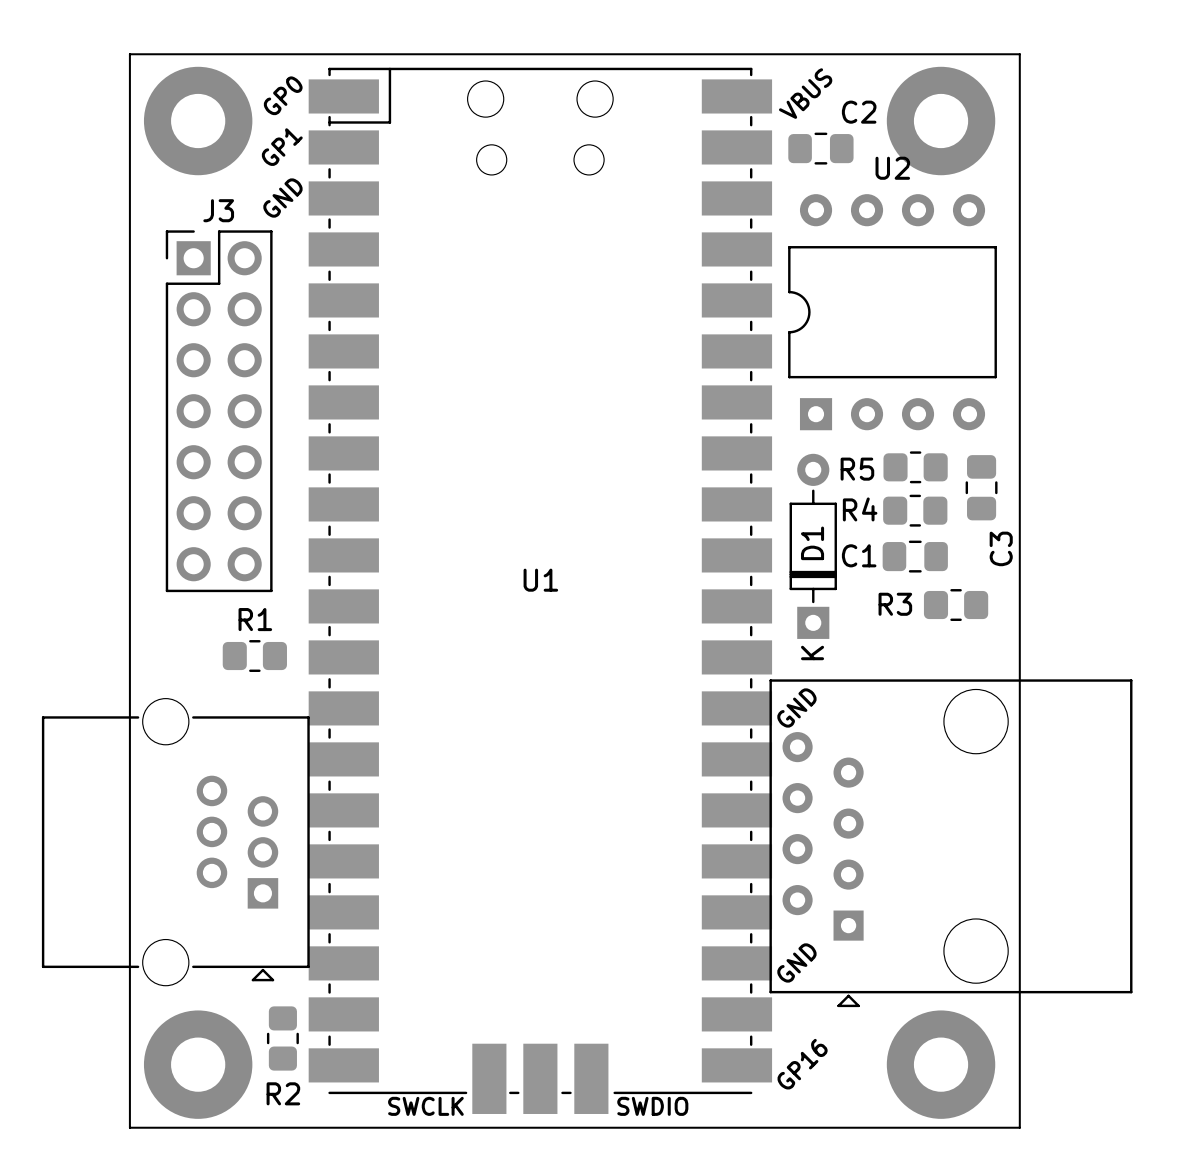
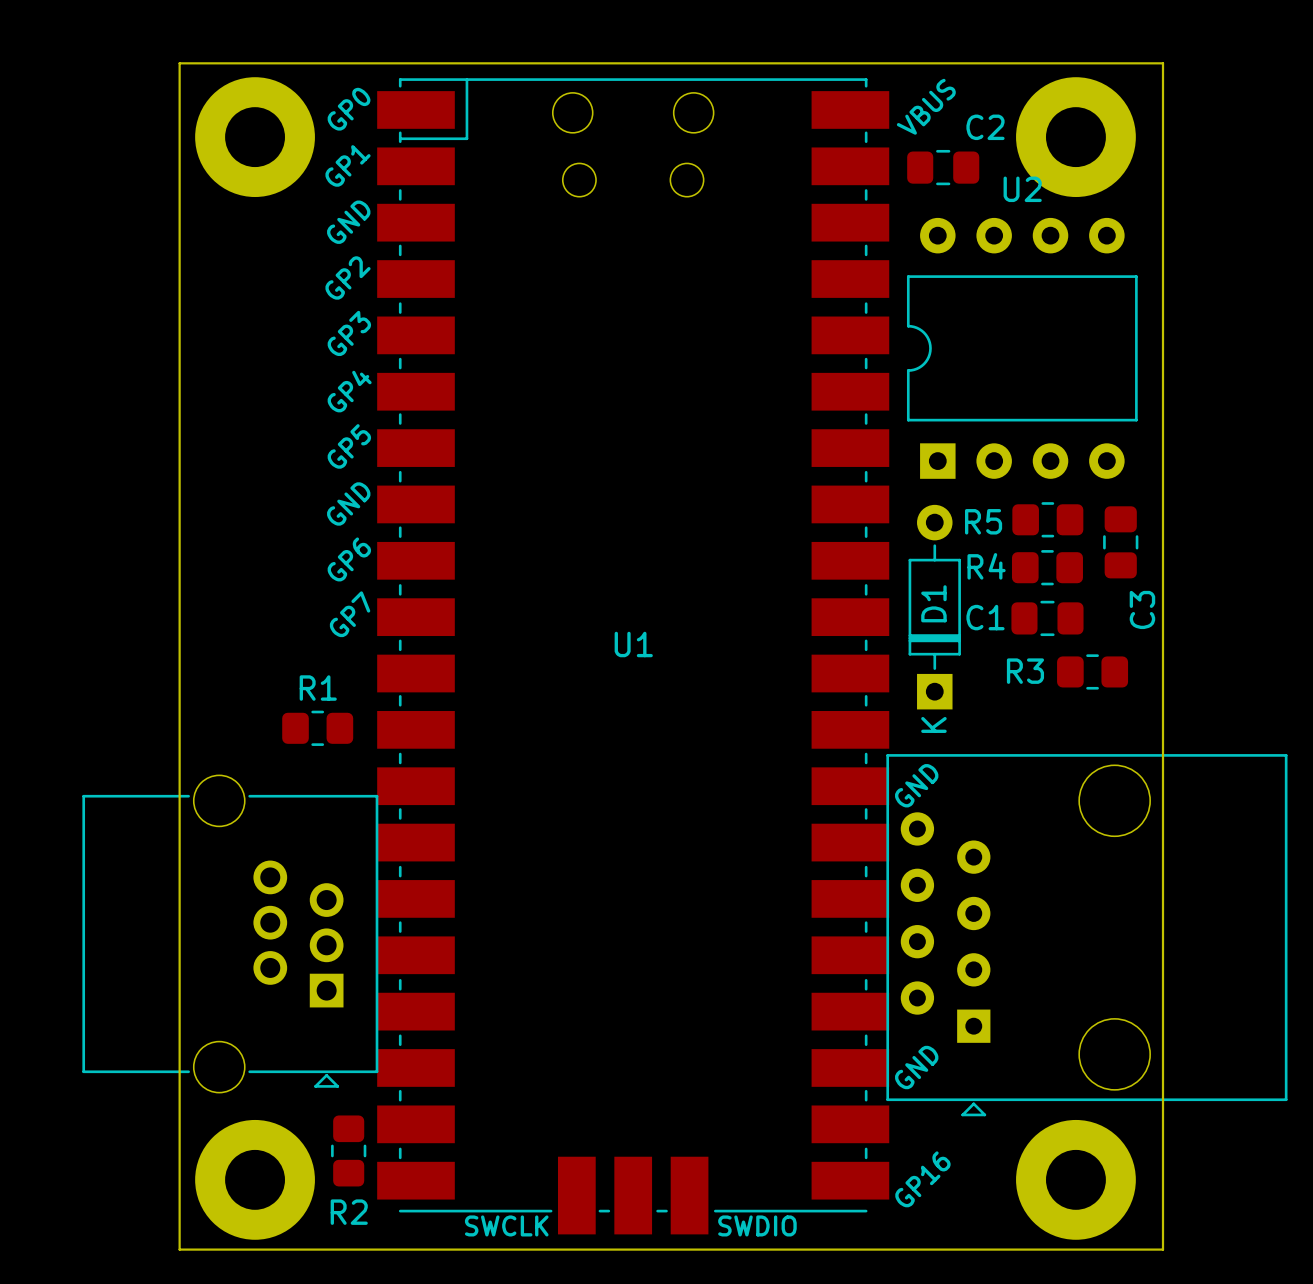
U1 text: none -> GP2 (348, 277)
U1 text: none -> GP3 (349, 333)
U1 text: none -> GP4 (349, 391)
U1 text: none -> GP5 (349, 446)
J3: (219, 411) -> none
U1 text: none -> GND (348, 503)
U1 text: none -> GP6 (349, 559)
U1 text: none -> GP7 (350, 614)

